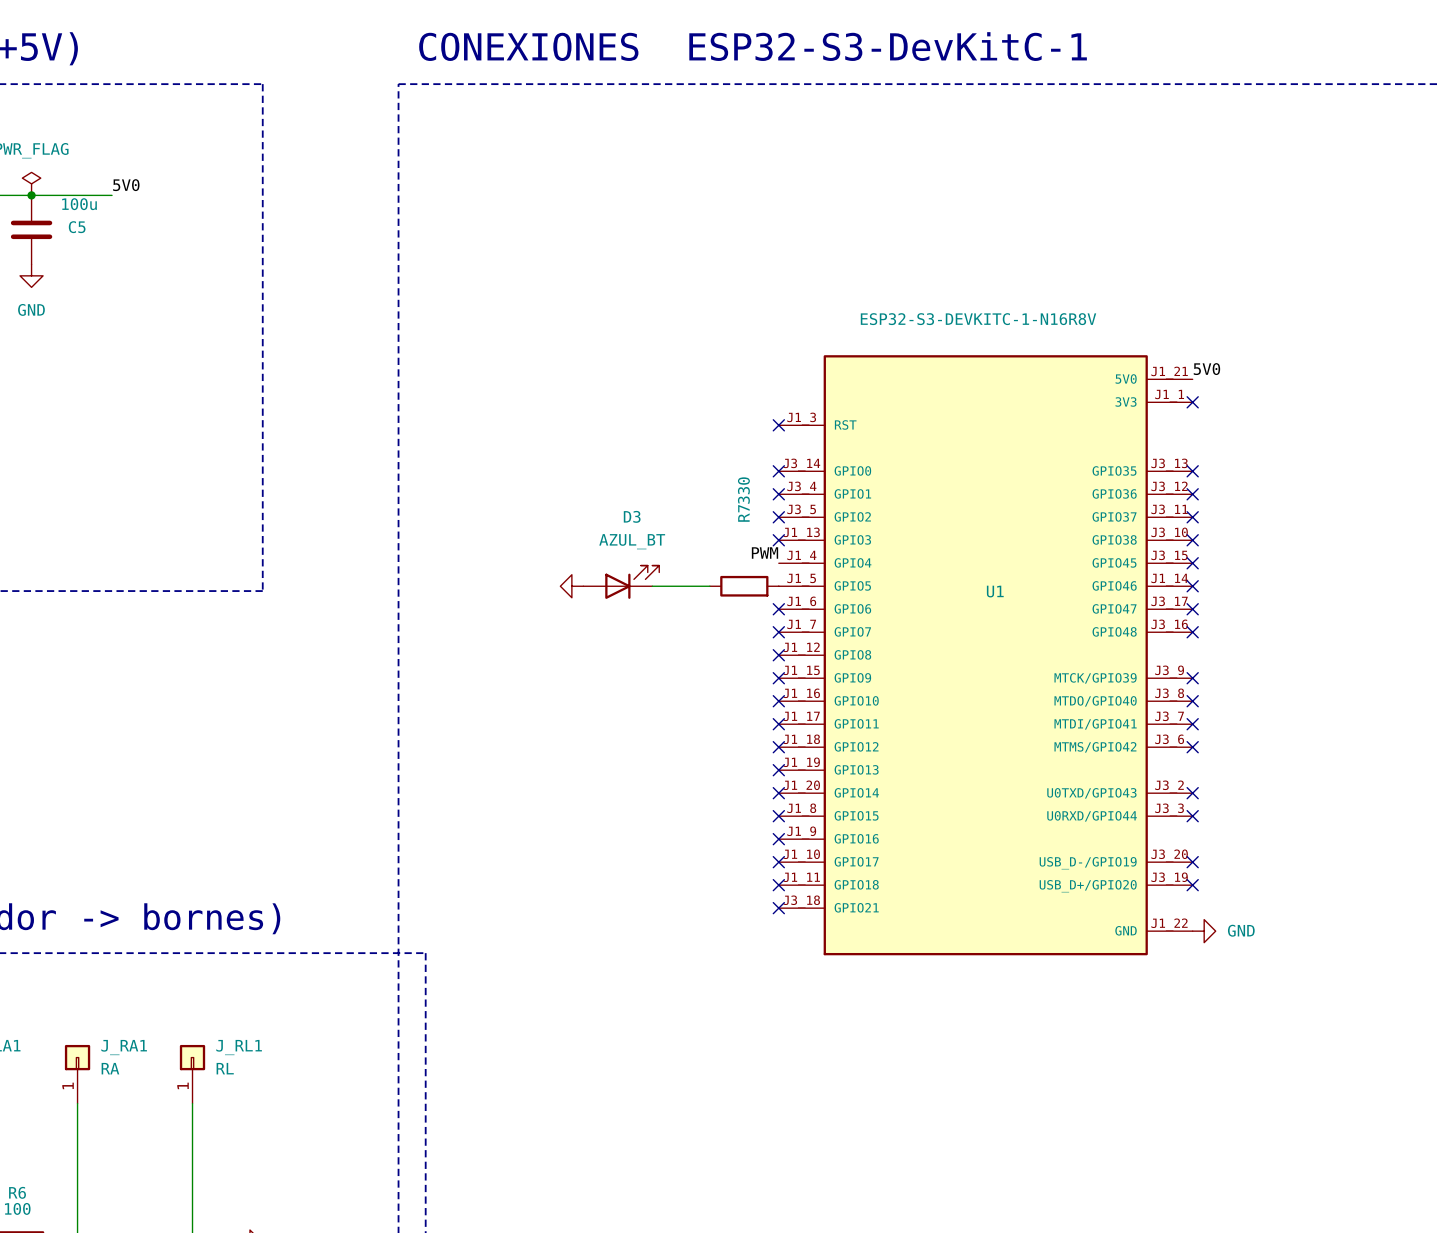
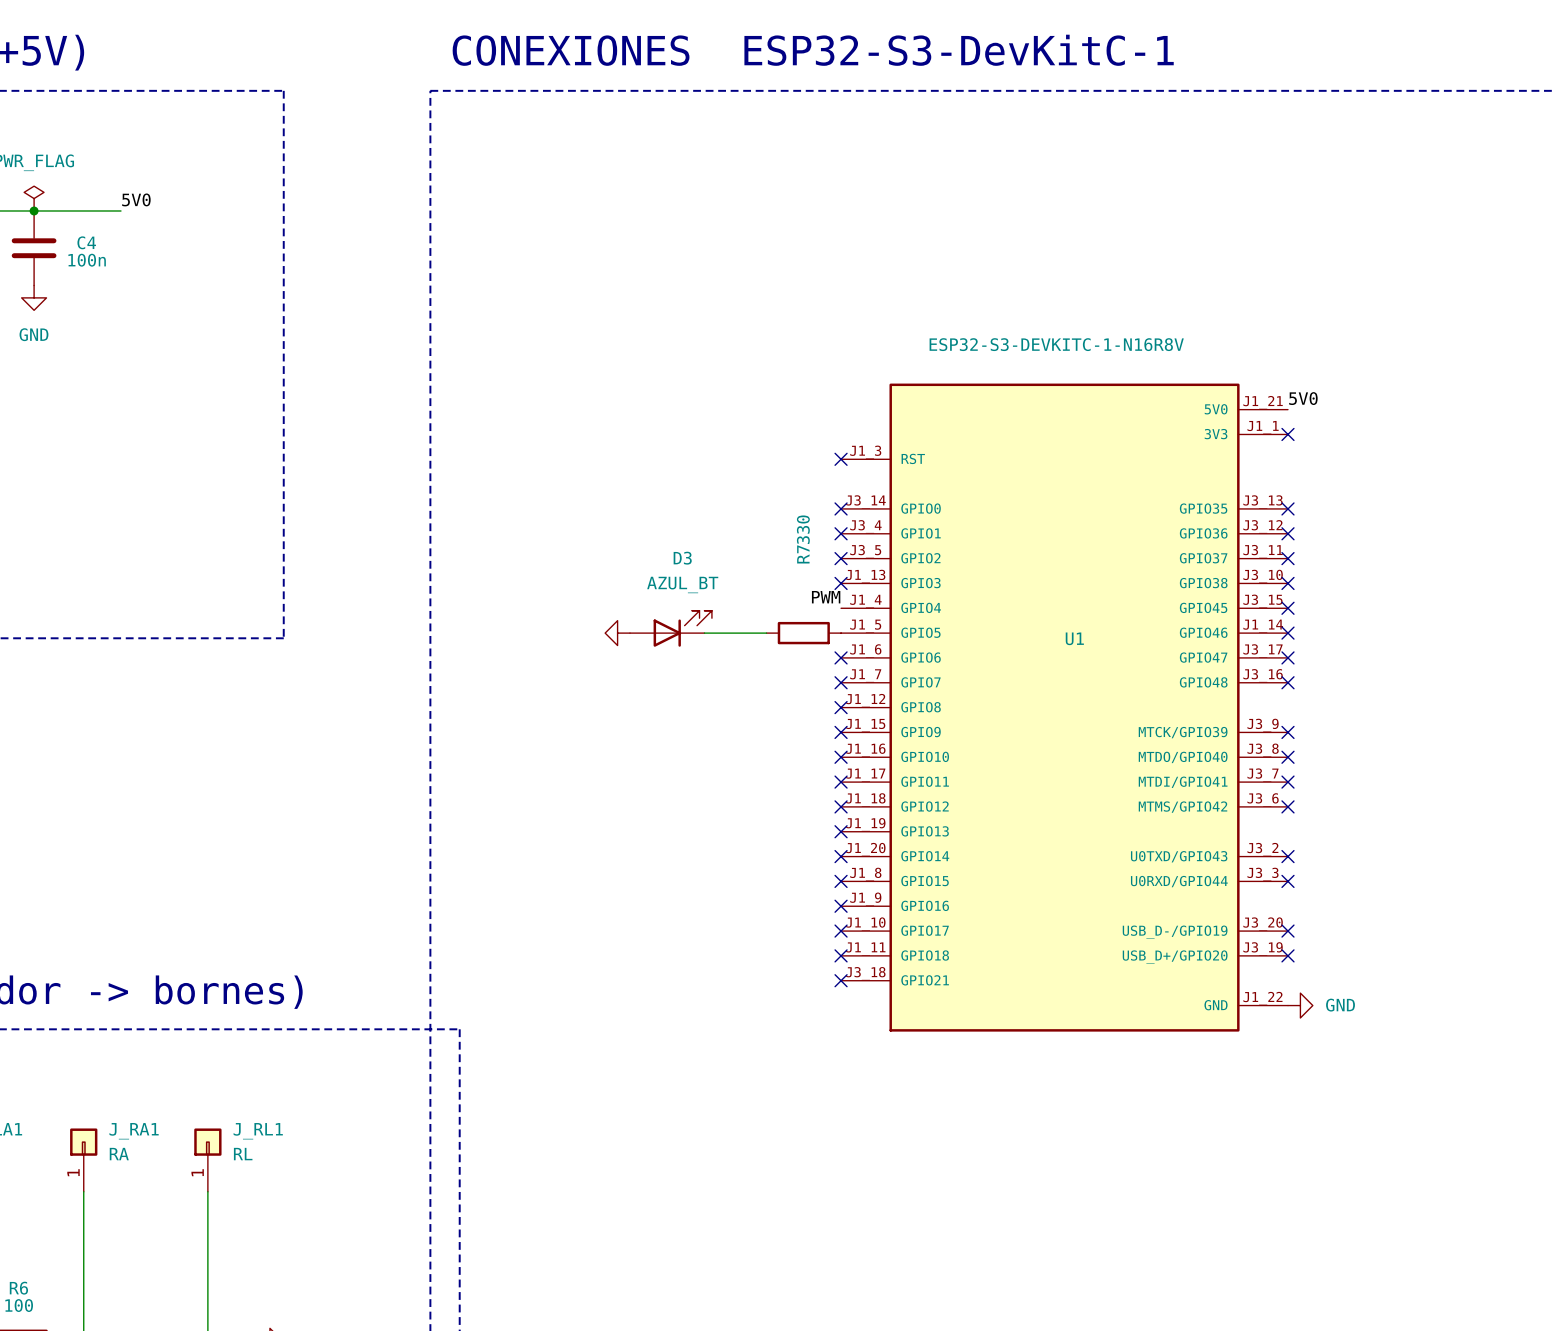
C5 value: 100u (79, 204) -> 100n (87, 260)
C5 name: C5 (77, 227) -> C4 (86, 242)

